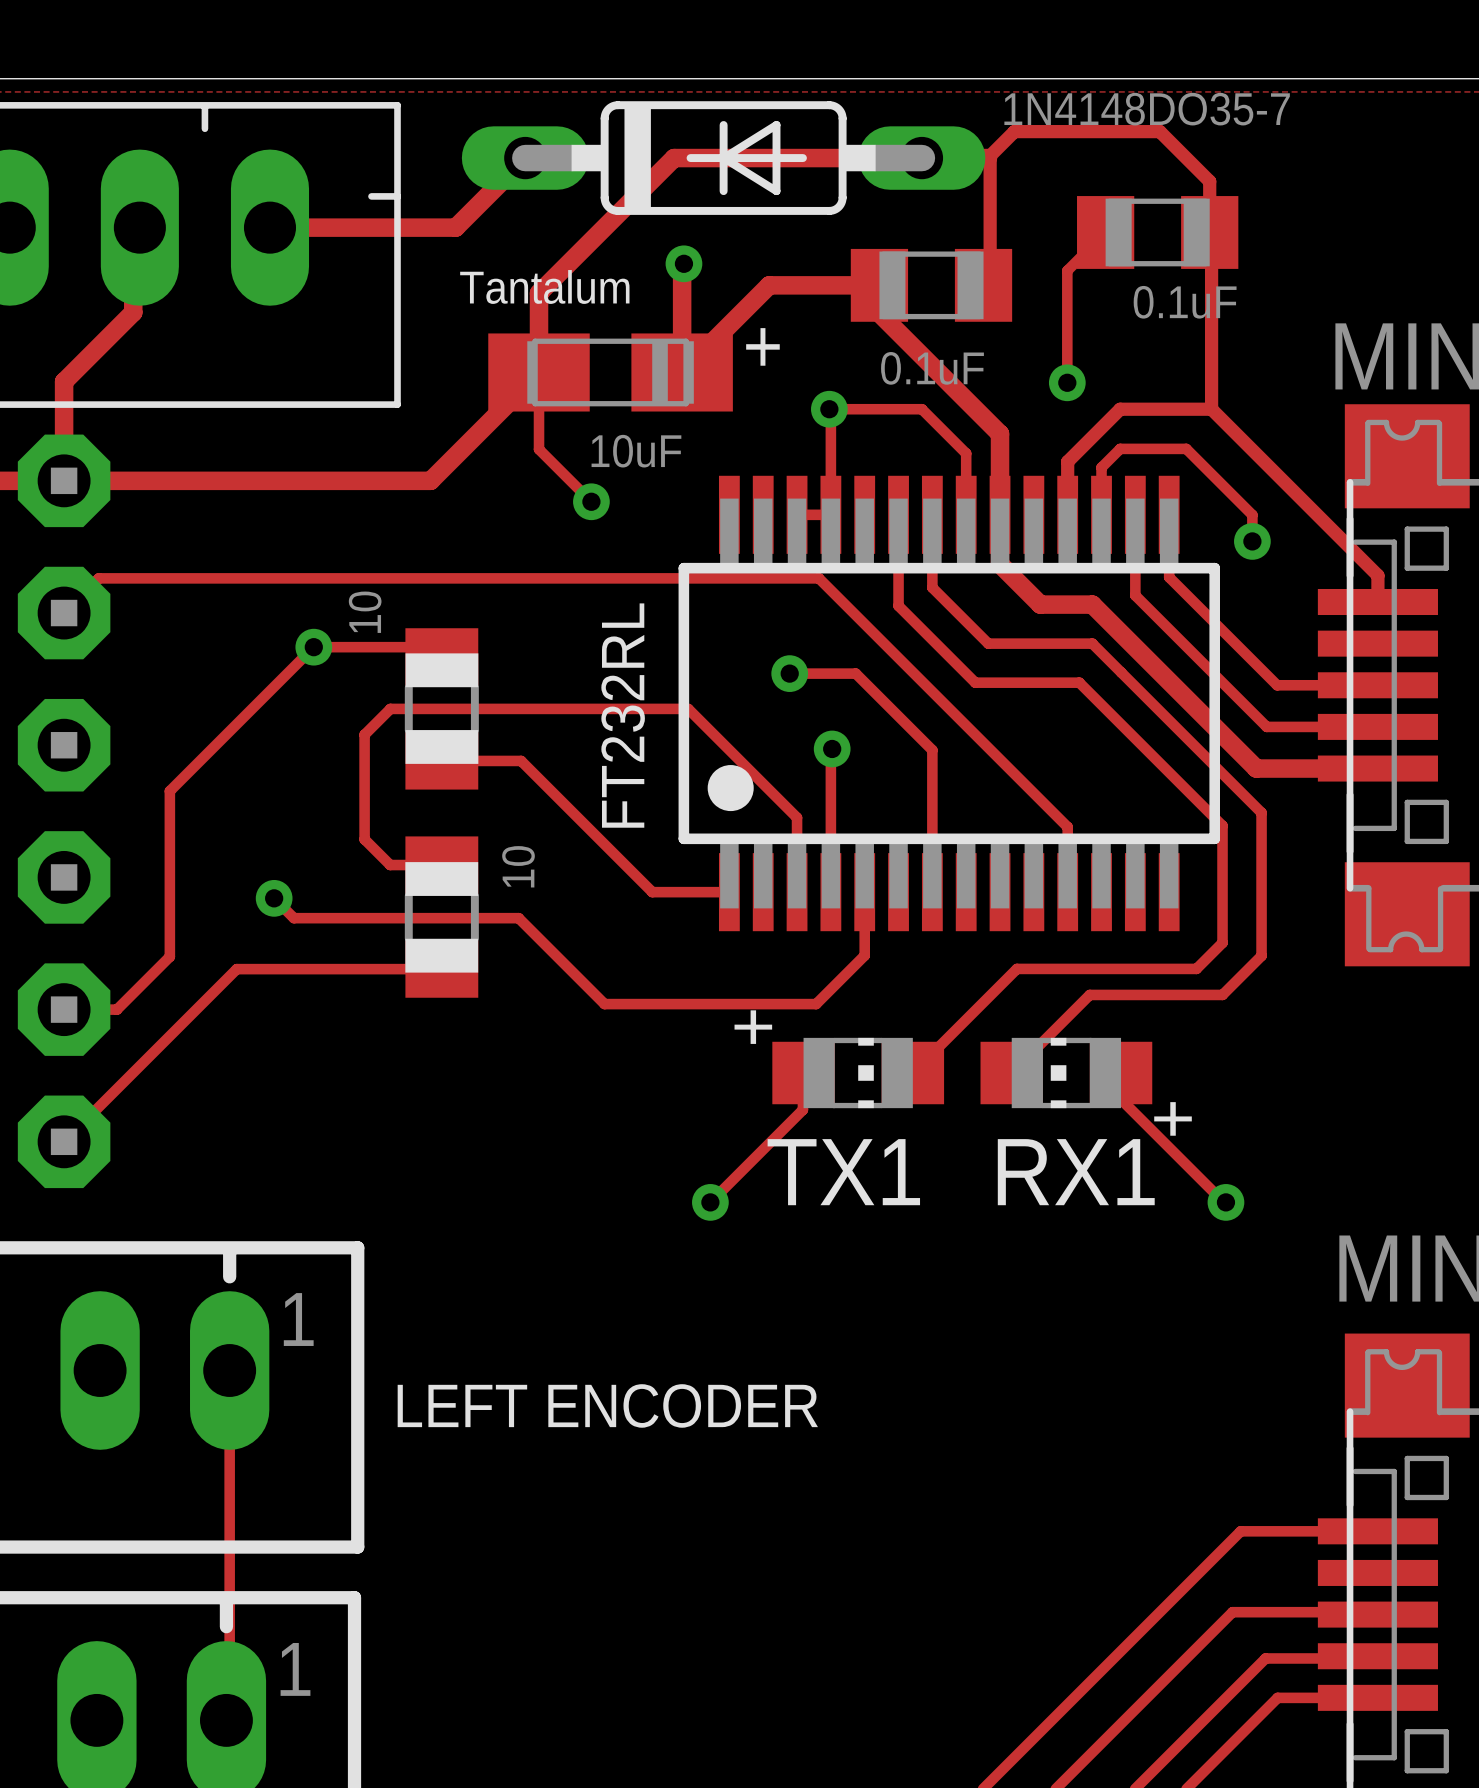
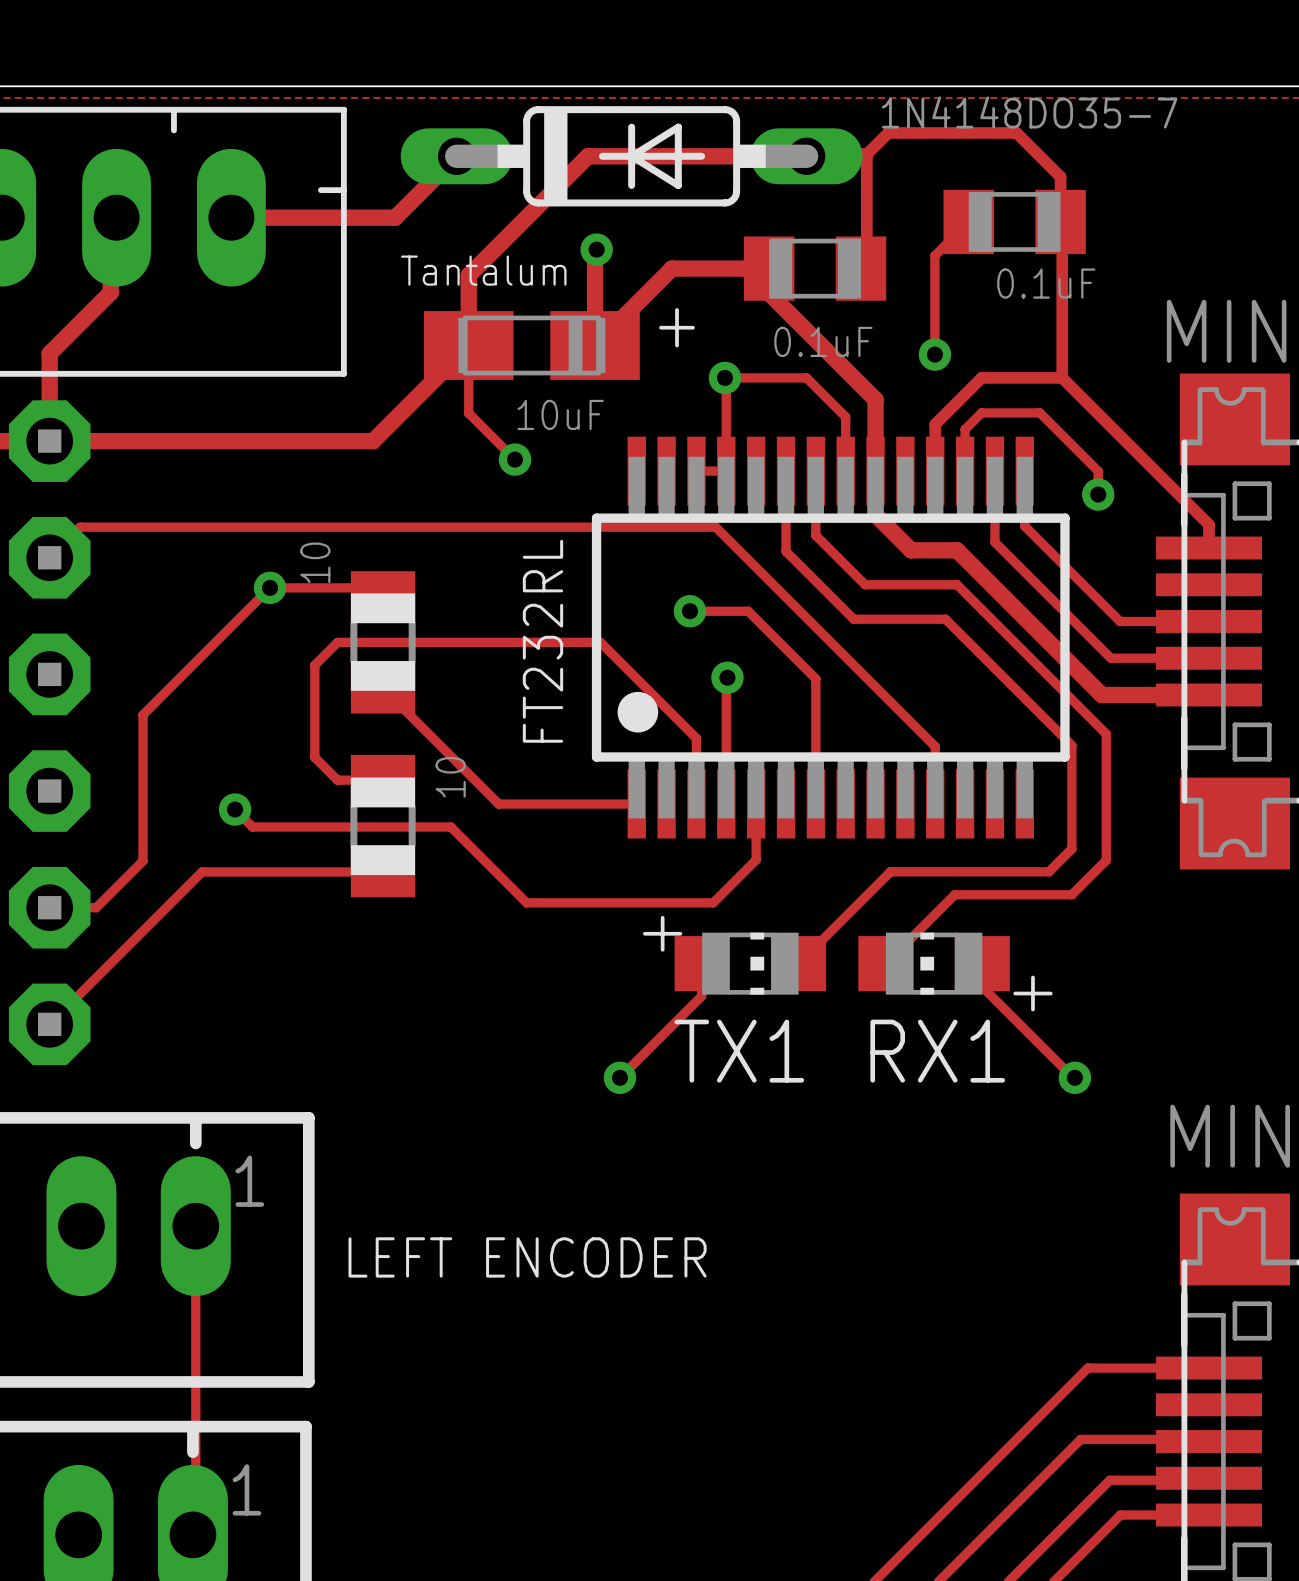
track: (441, 760) (521, 760) (652, 892) -> (383, 688) (498, 804) (568, 804)

